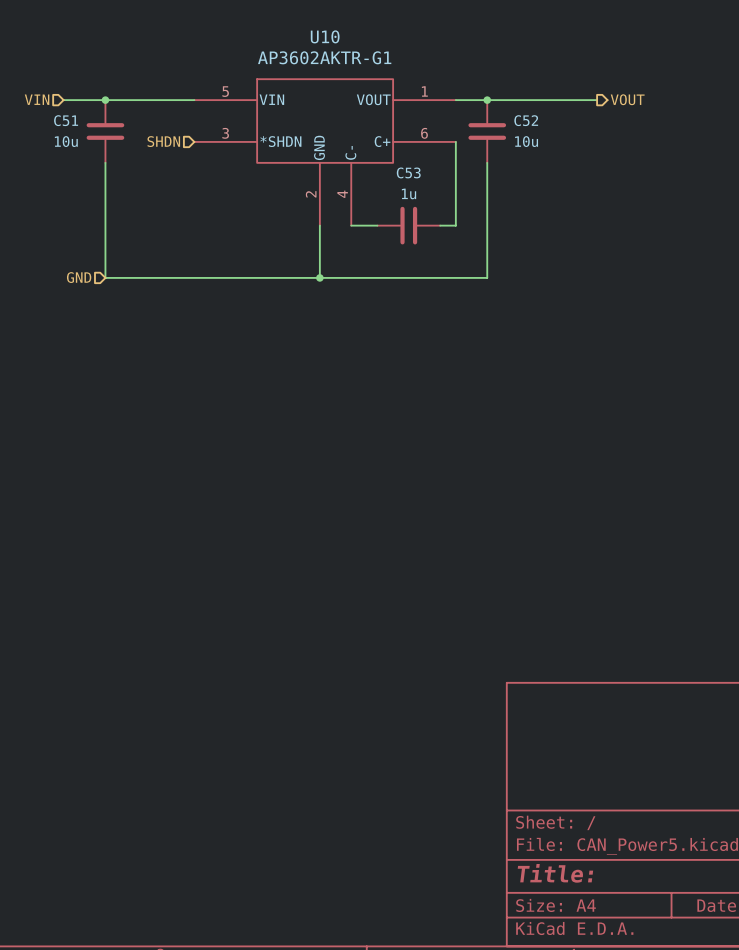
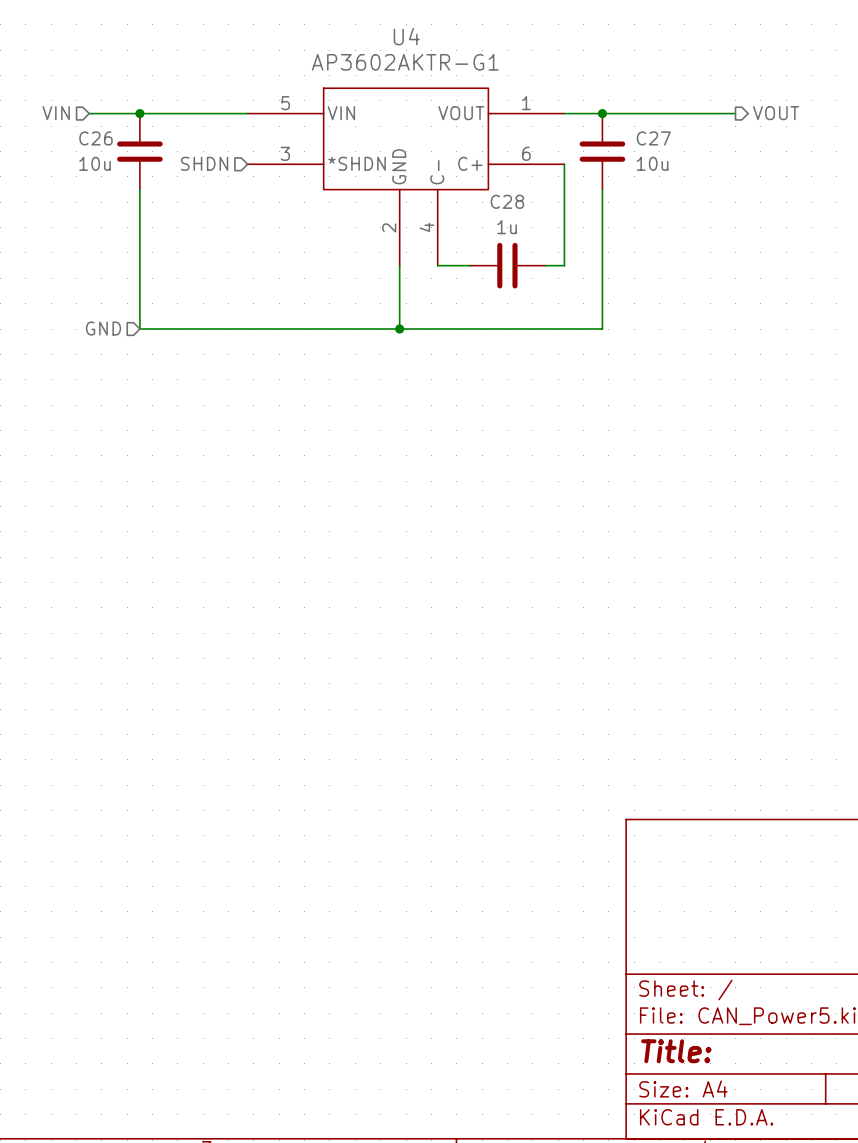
U10 name: U10 (325, 36) -> U4 (406, 36)
C51 name: C51 (66, 120) -> C26 (95, 138)
C52 name: C52 (526, 120) -> C27 (653, 138)
C53 name: C53 (408, 172) -> C28 (507, 201)

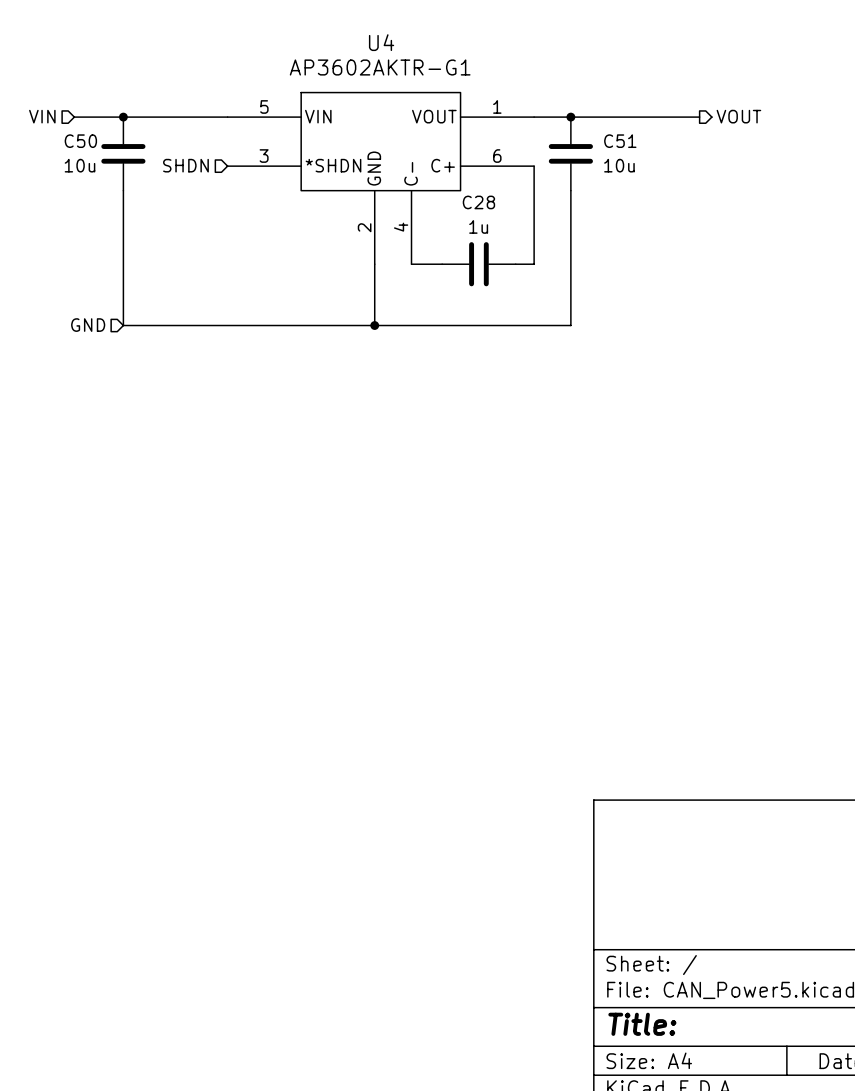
C26 name: C26 (95, 138) -> C50 (80, 141)
C27 name: C27 (653, 138) -> C51 (620, 141)

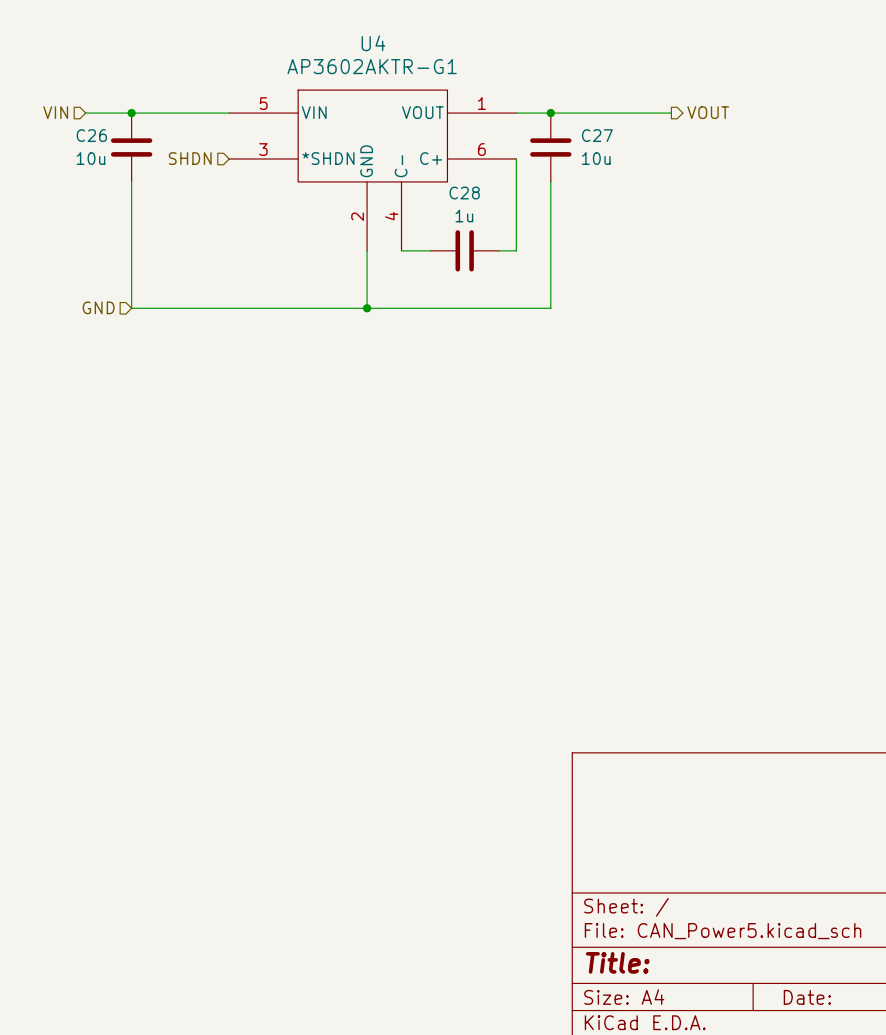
C50 name: C50 (80, 141) -> C26 (91, 135)
C51 name: C51 (620, 141) -> C27 (597, 135)

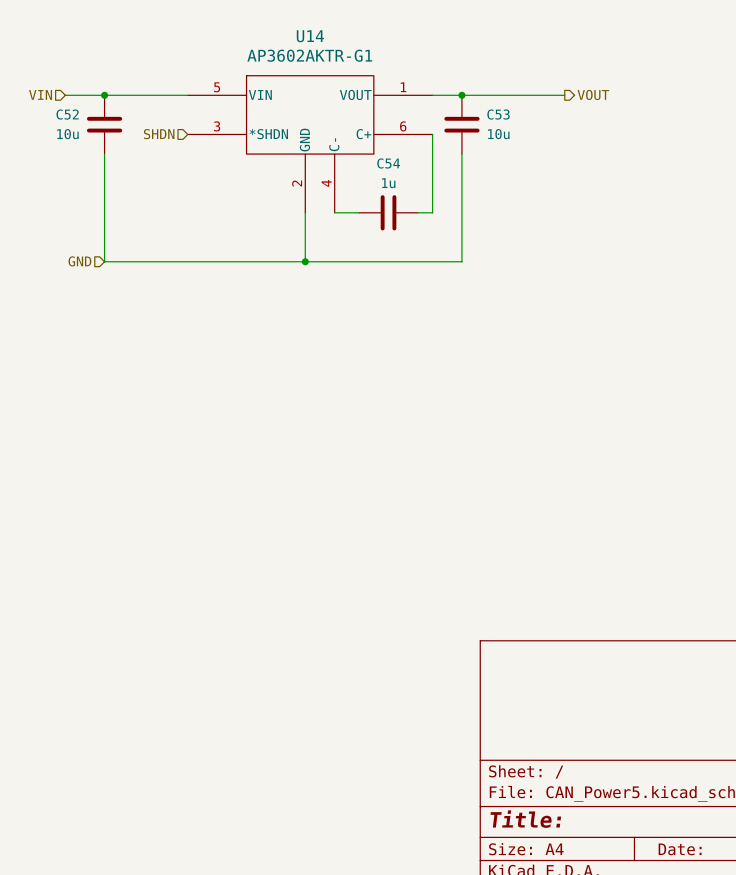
U4 name: U4 (373, 43) -> U14 (310, 36)
C26 name: C26 (91, 135) -> C52 (67, 114)
C27 name: C27 (597, 135) -> C53 (498, 114)
C28 name: C28 (464, 193) -> C54 (388, 163)

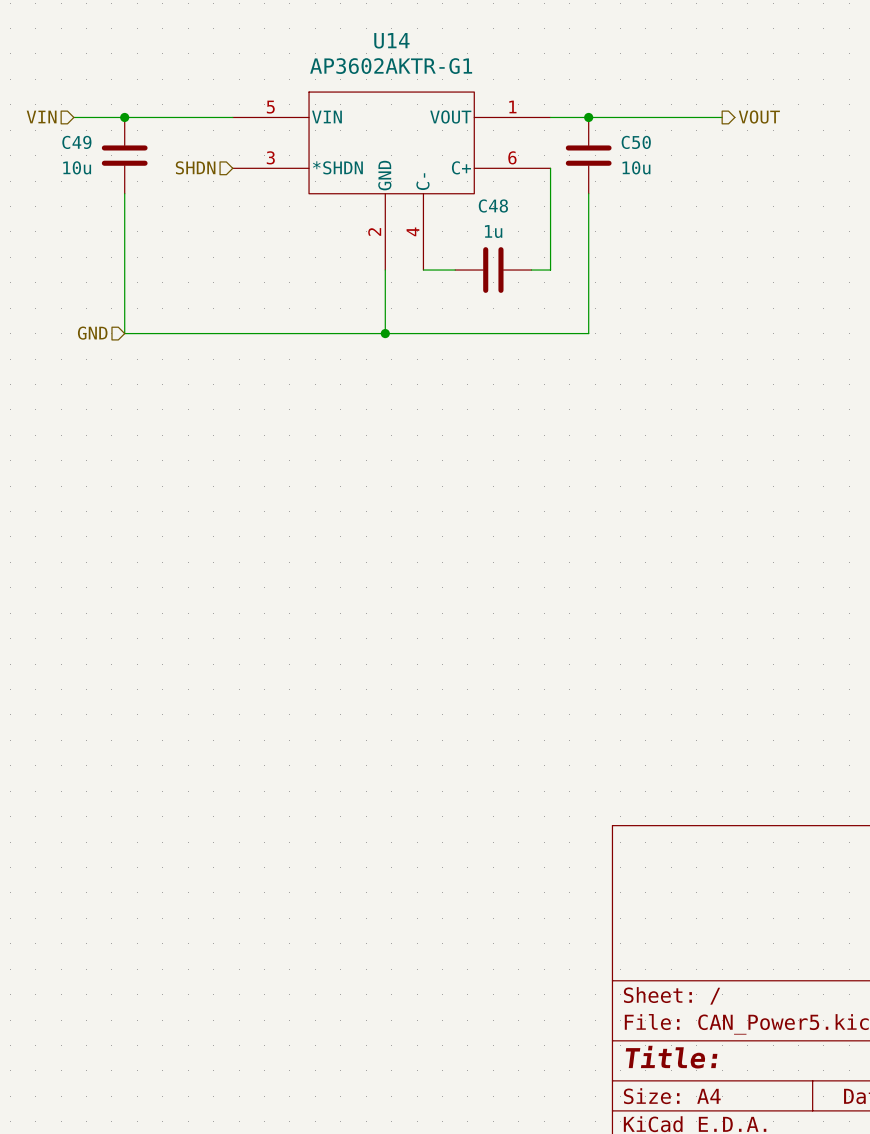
C52 name: C52 (67, 114) -> C49 (76, 142)
C53 name: C53 (498, 114) -> C50 (636, 142)
C54 name: C54 (388, 163) -> C48 (493, 205)

